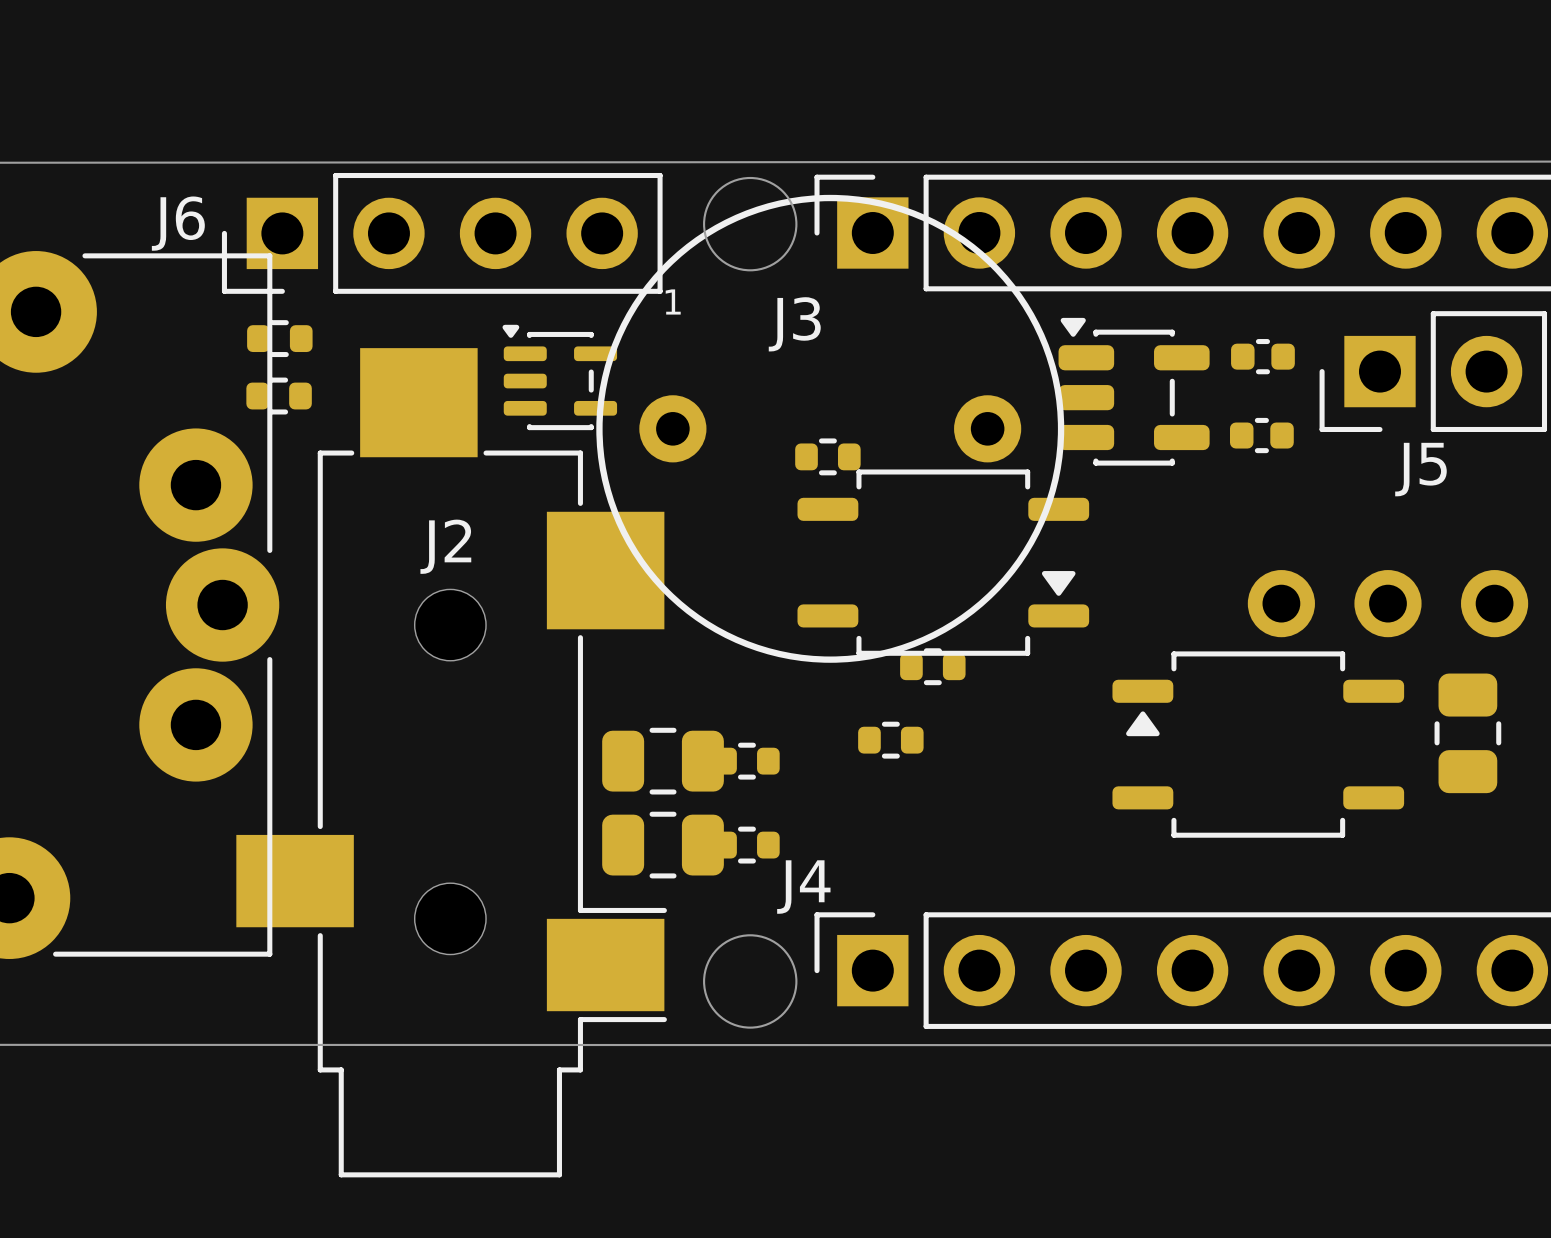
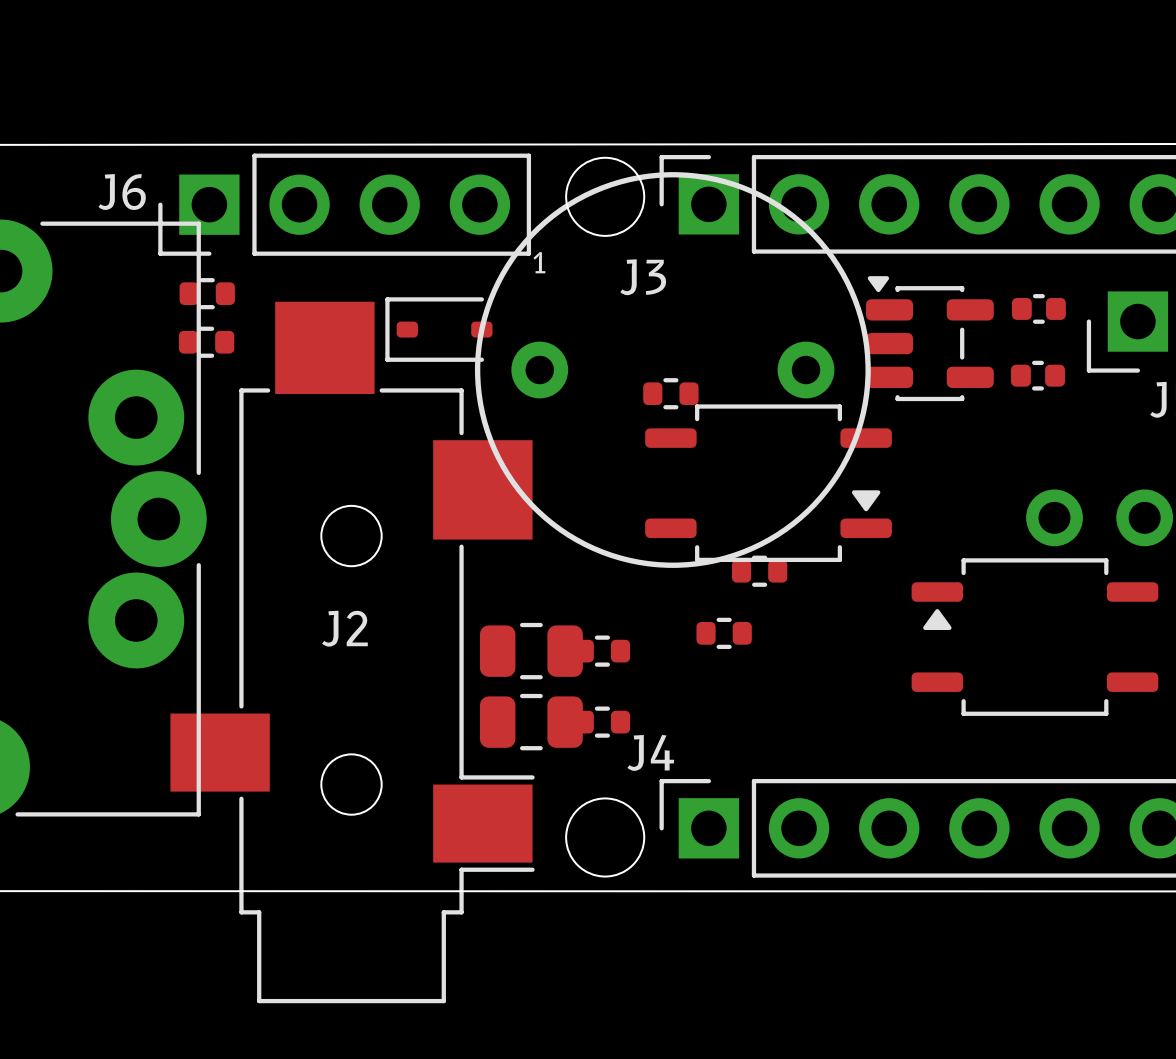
part footprint: [502, 324, 618, 431] -> [385, 297, 493, 362]
J2 name position: J2 (445, 546) -> J2 (344, 628)

